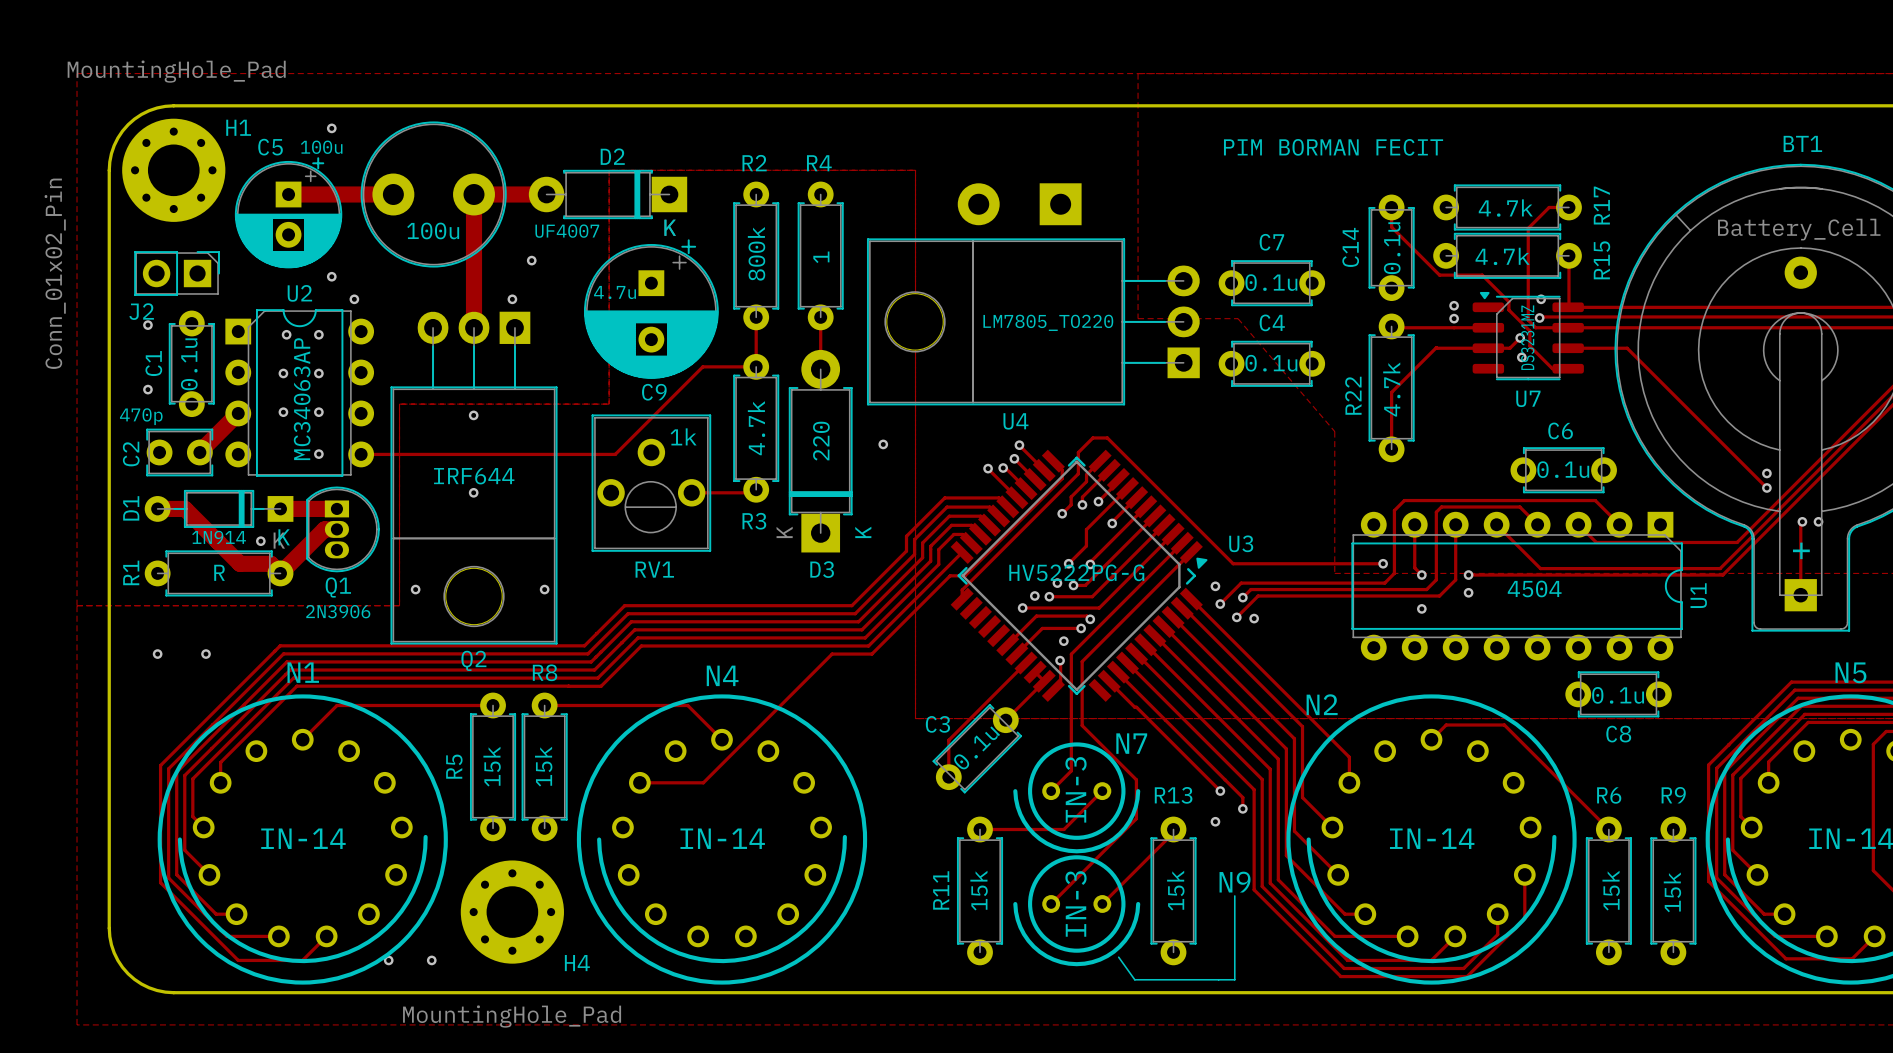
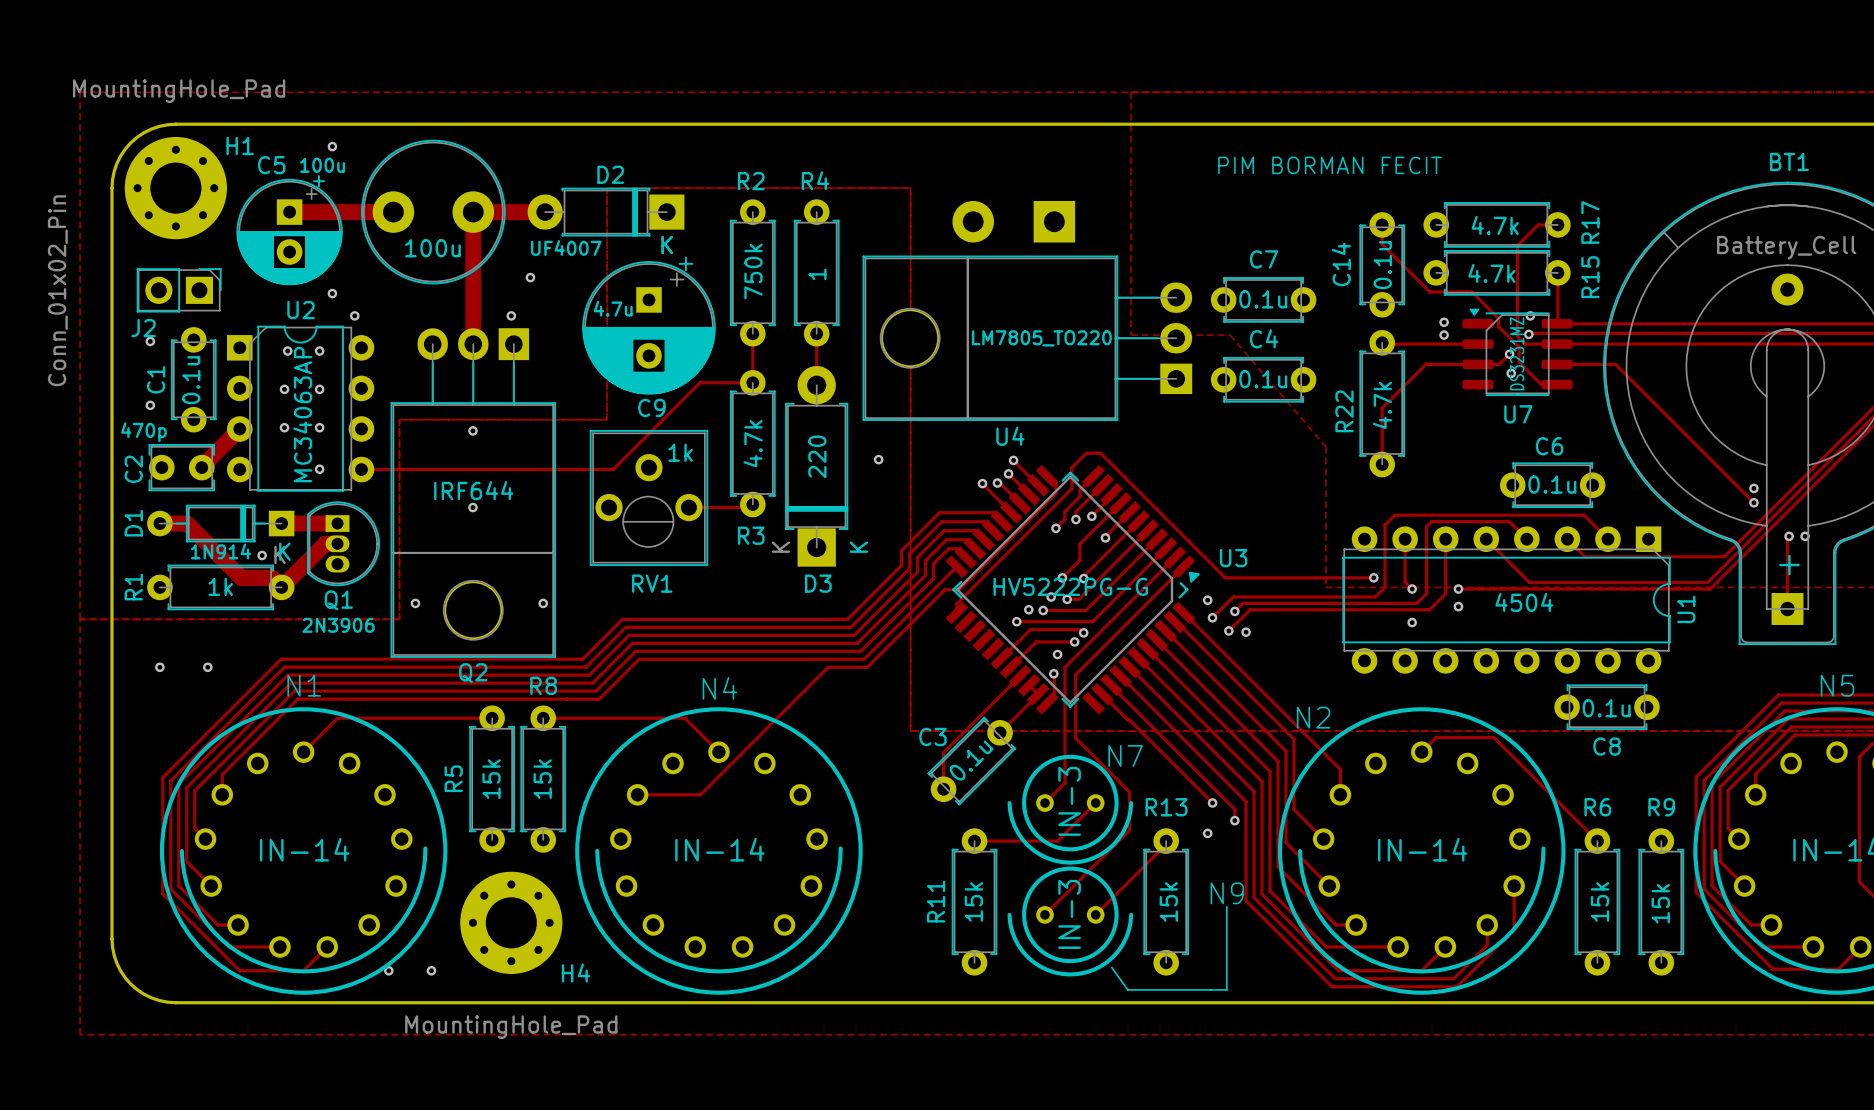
R2 value: 800k (756, 253) -> 750k (753, 271)
R1 value: R (219, 572) -> 1k (220, 586)

